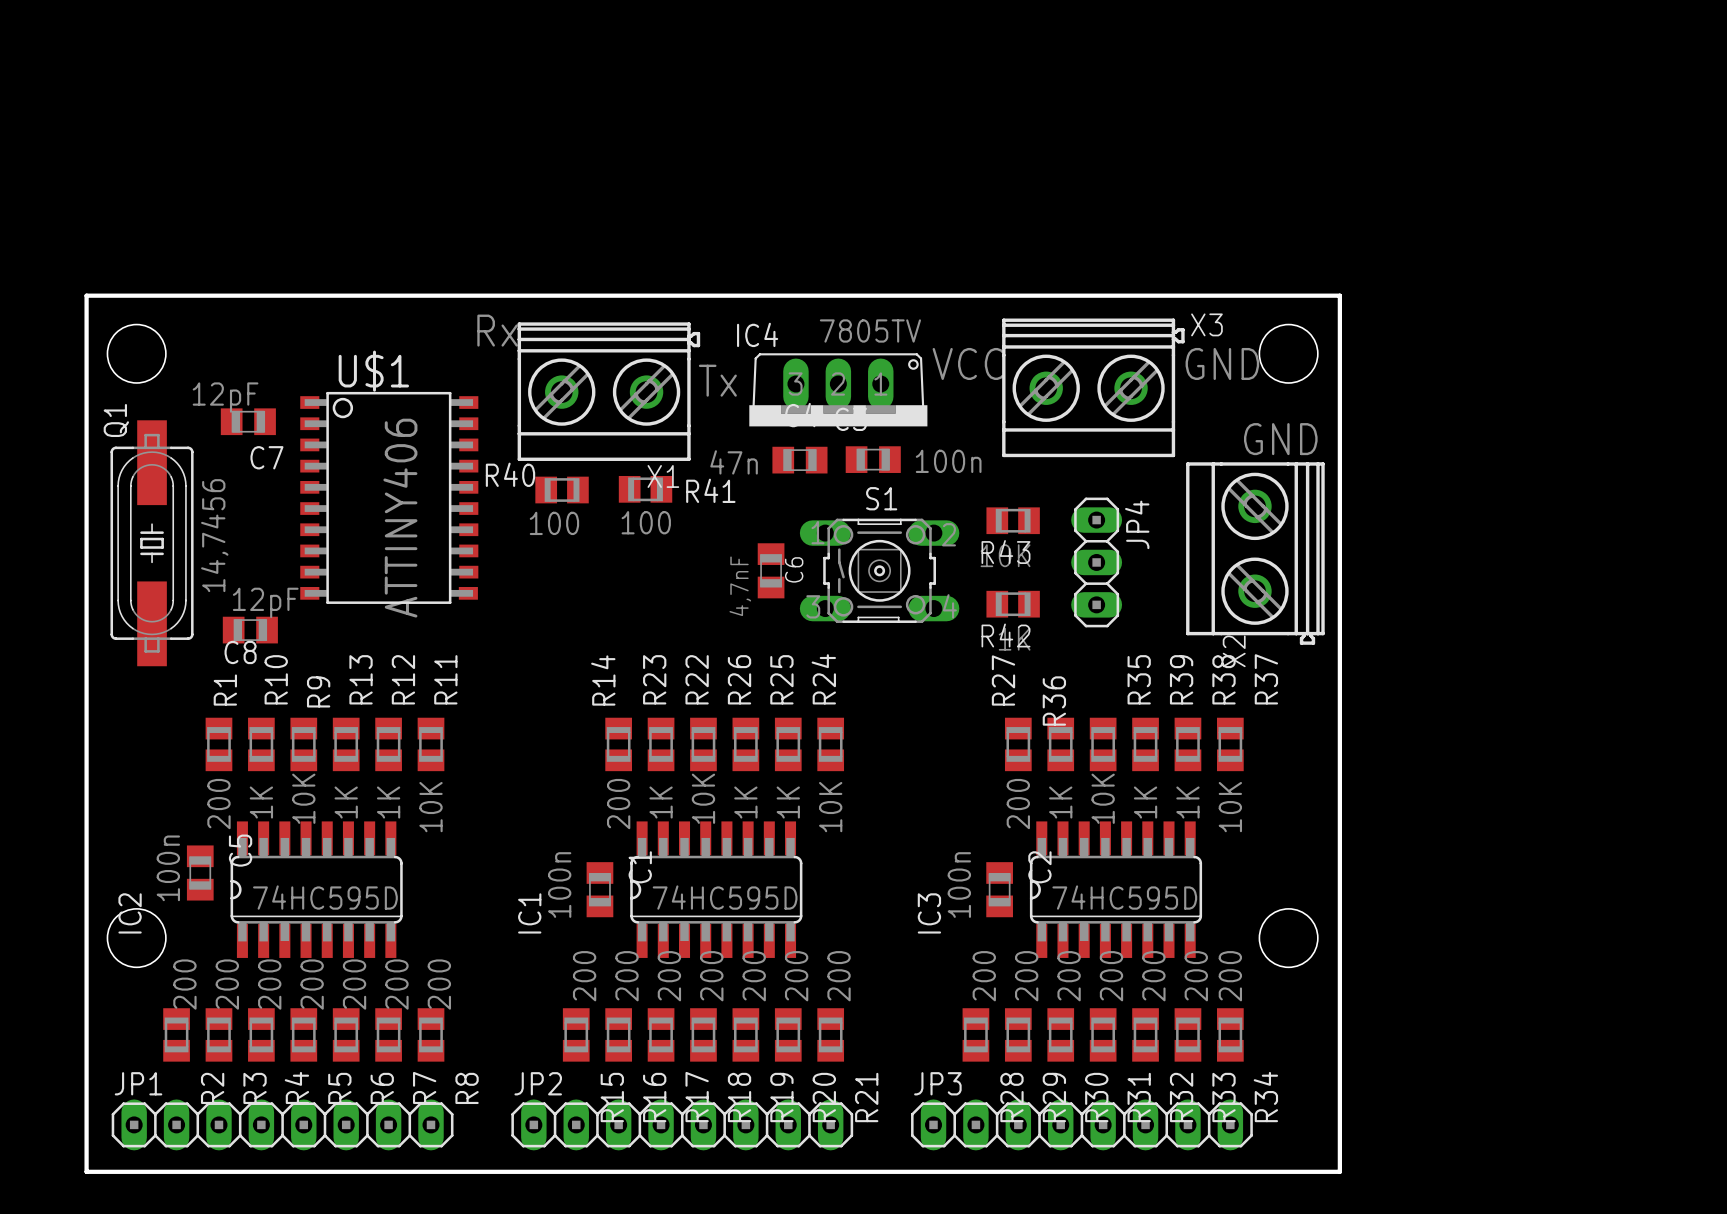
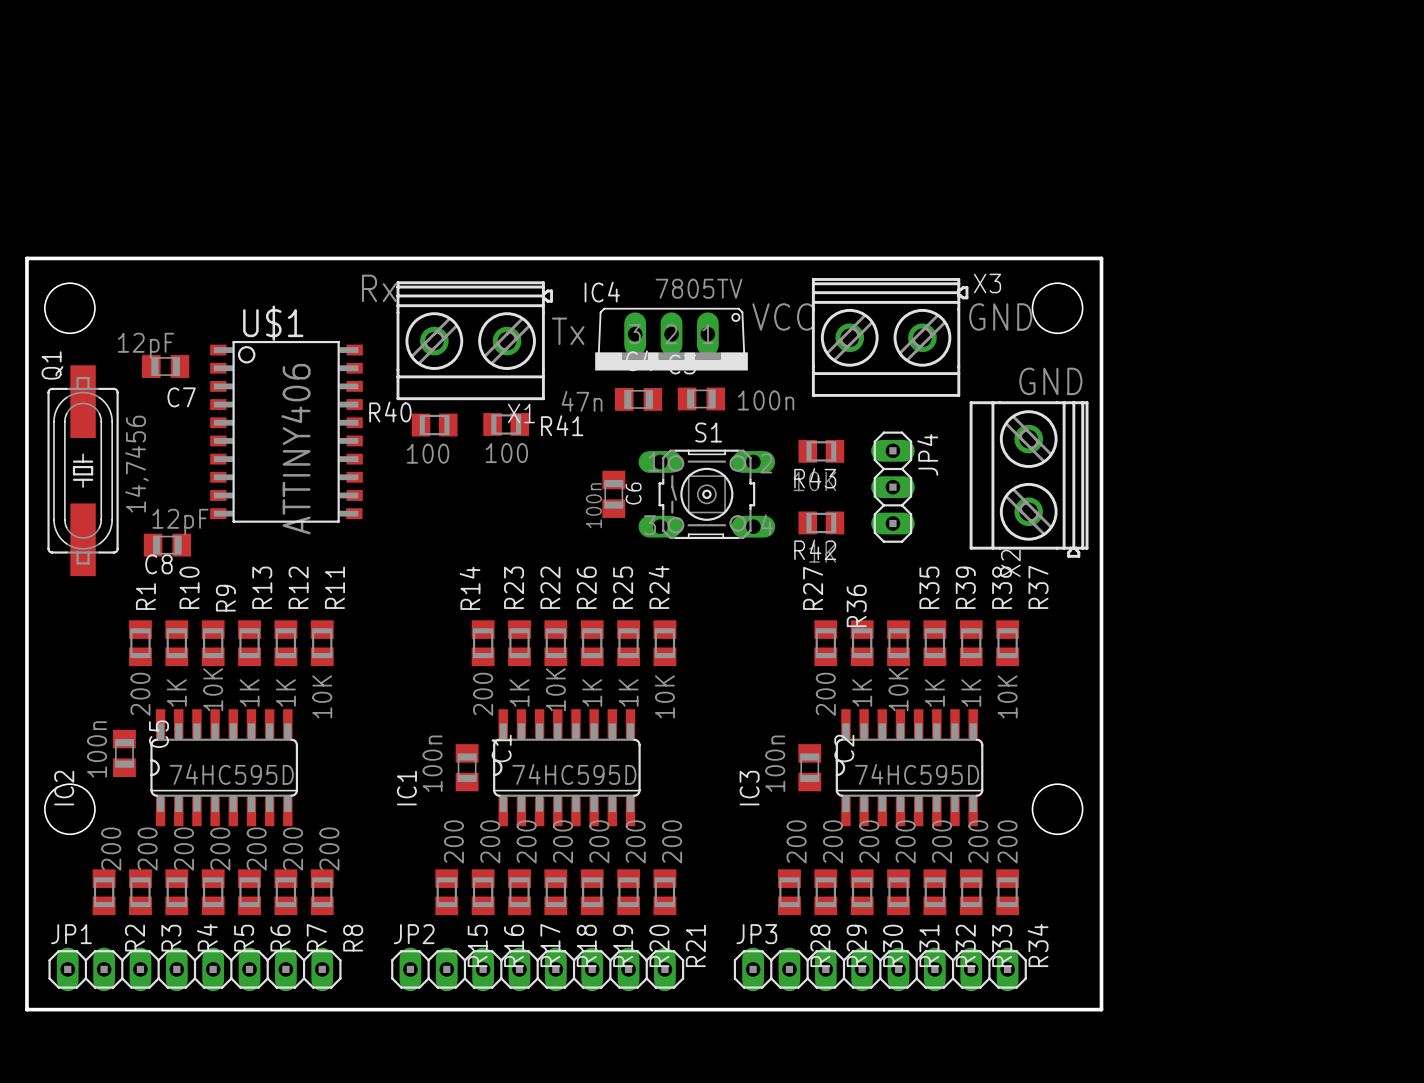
C6 value: 4,7nF (740, 586) -> 100n (593, 505)

